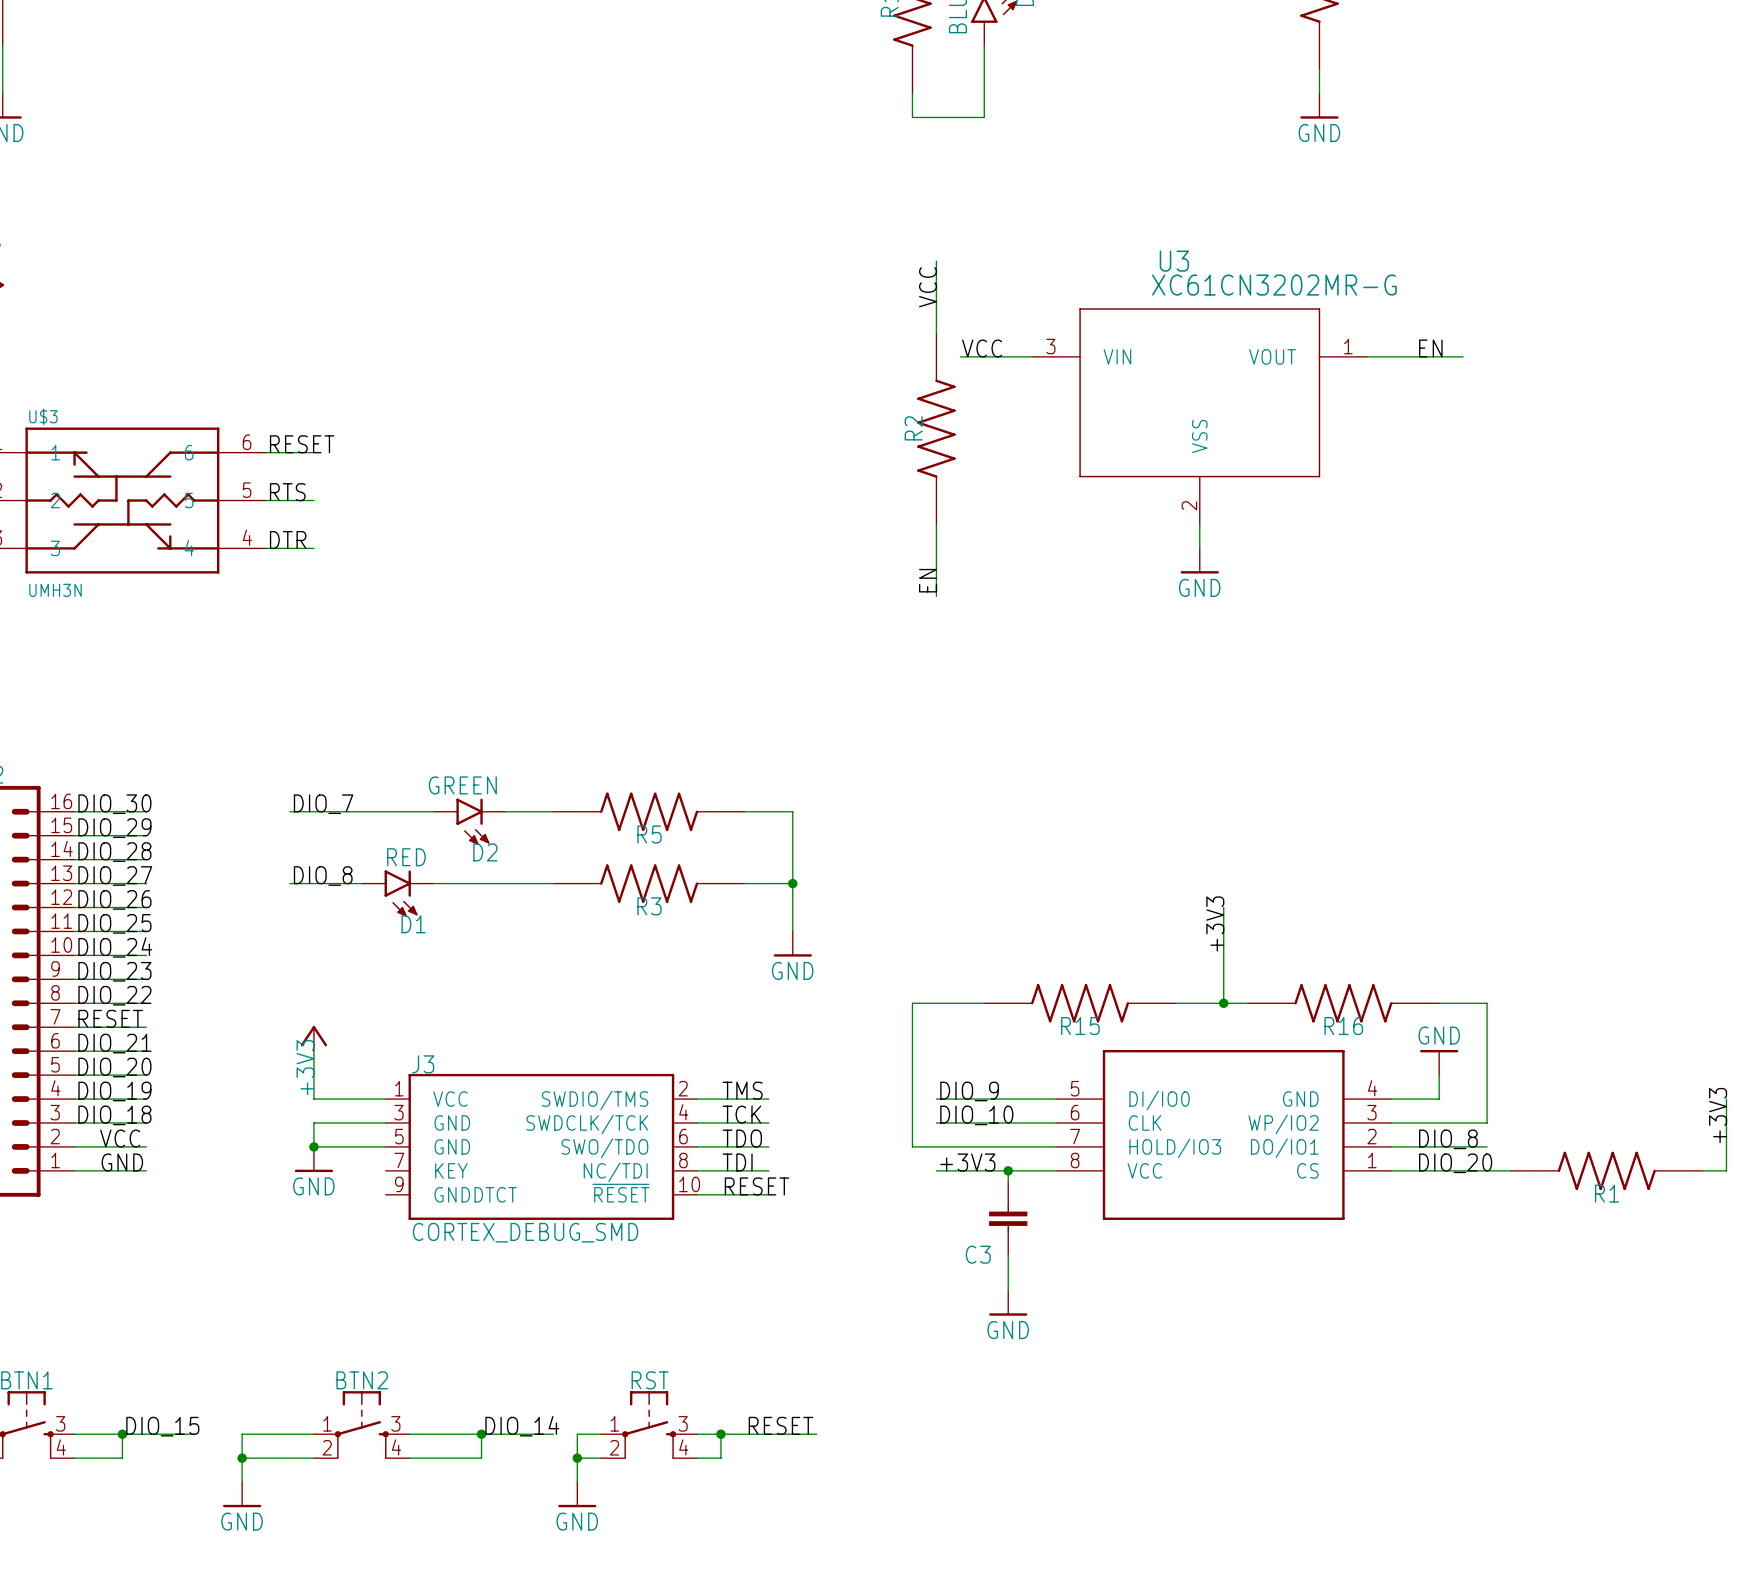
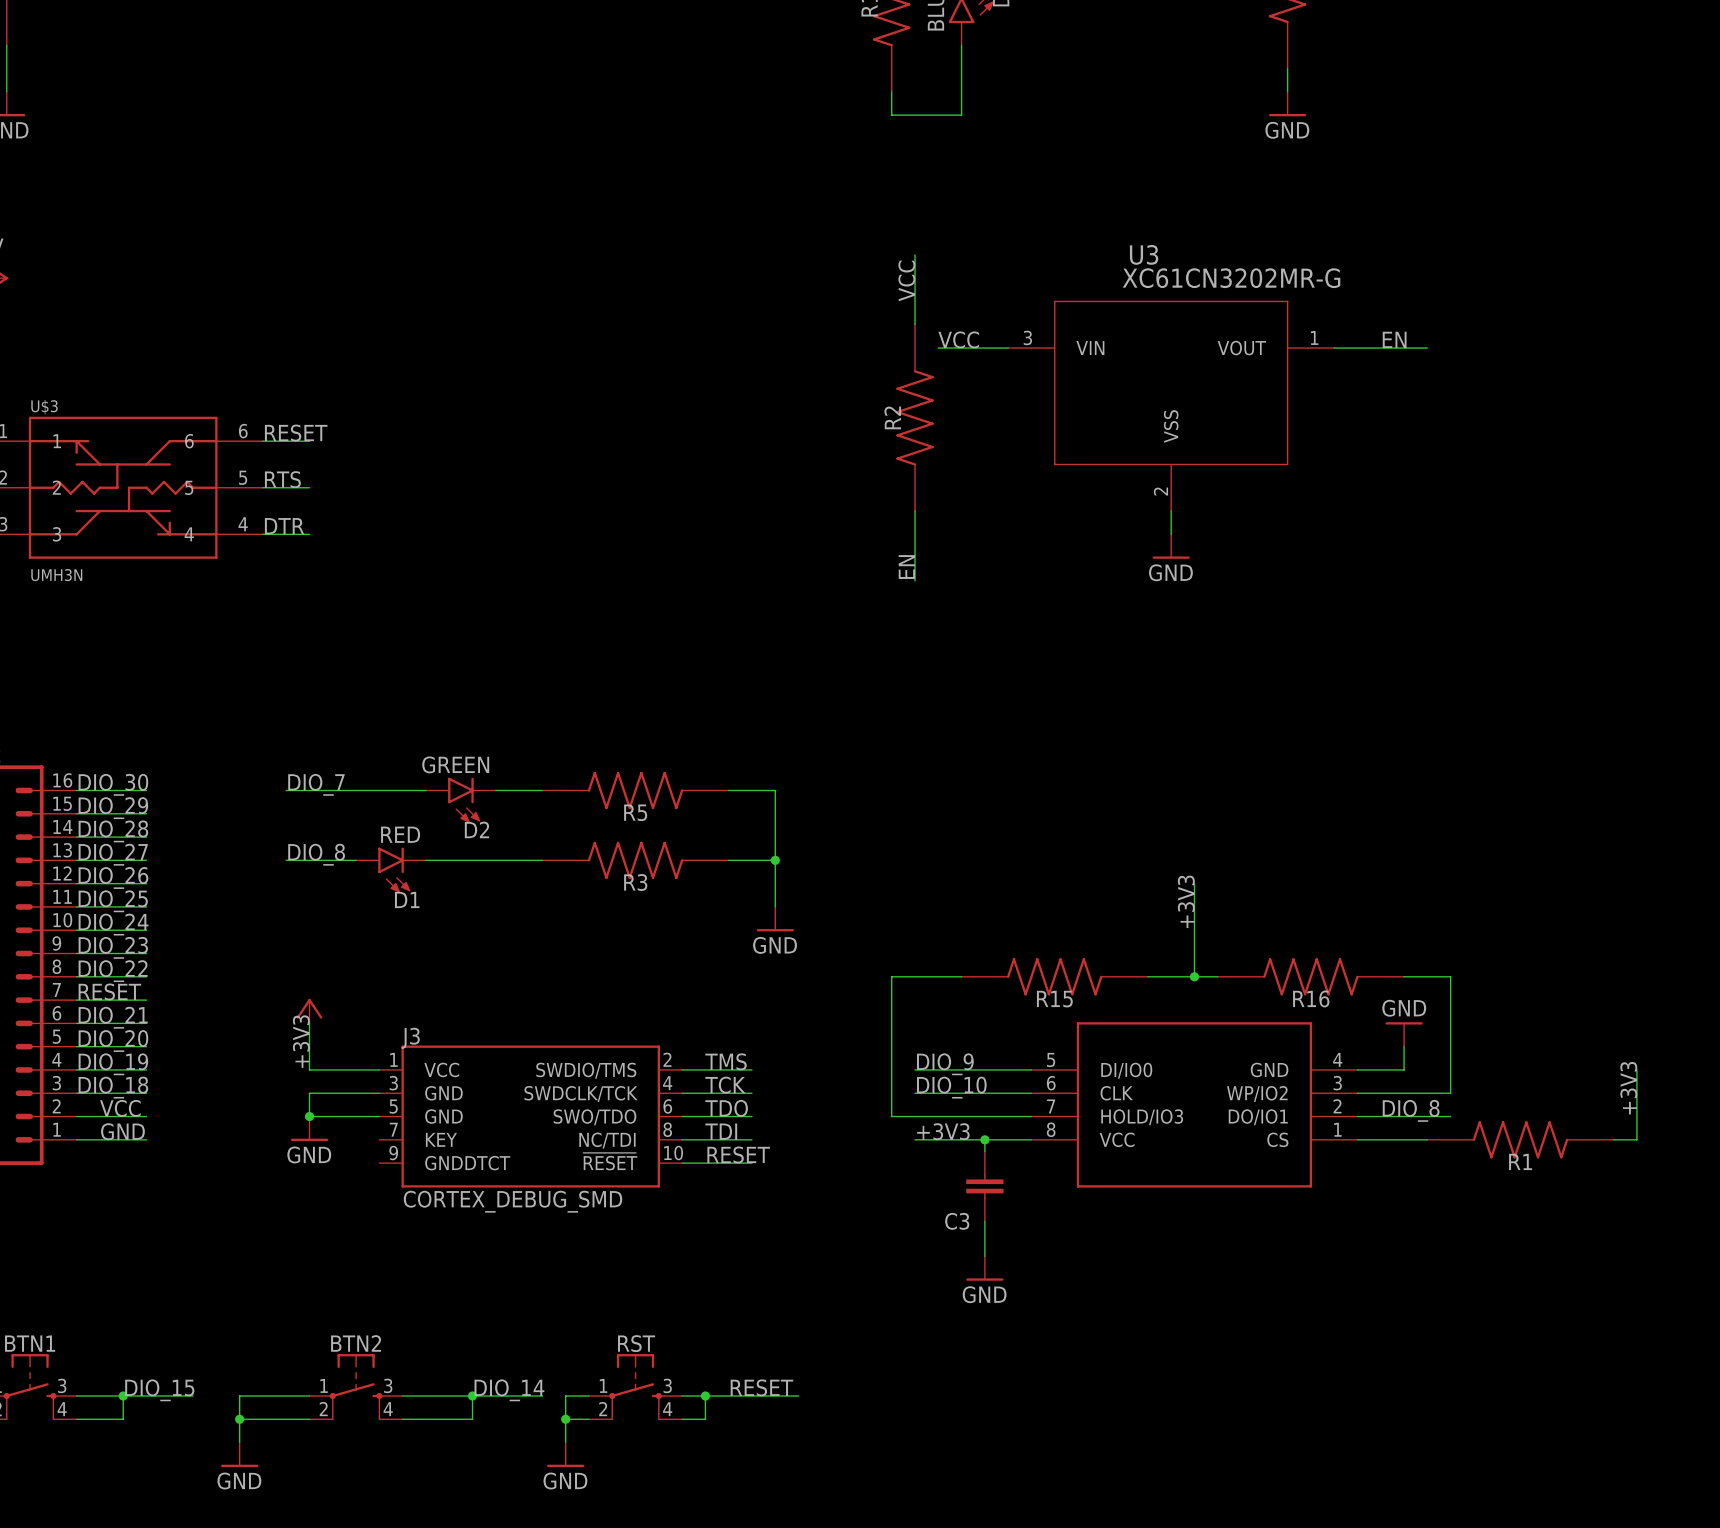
wire: (1726, 1099) (1726, 1170) (1702, 1170) -> (1636, 1069) (1636, 1139) (1613, 1139)
label position: +3V3 (1718, 1115) -> +3V3 (1628, 1088)
label: DIO_20 (1455, 1163) -> none
R1 position: (1606, 1170) -> (1520, 1139)

